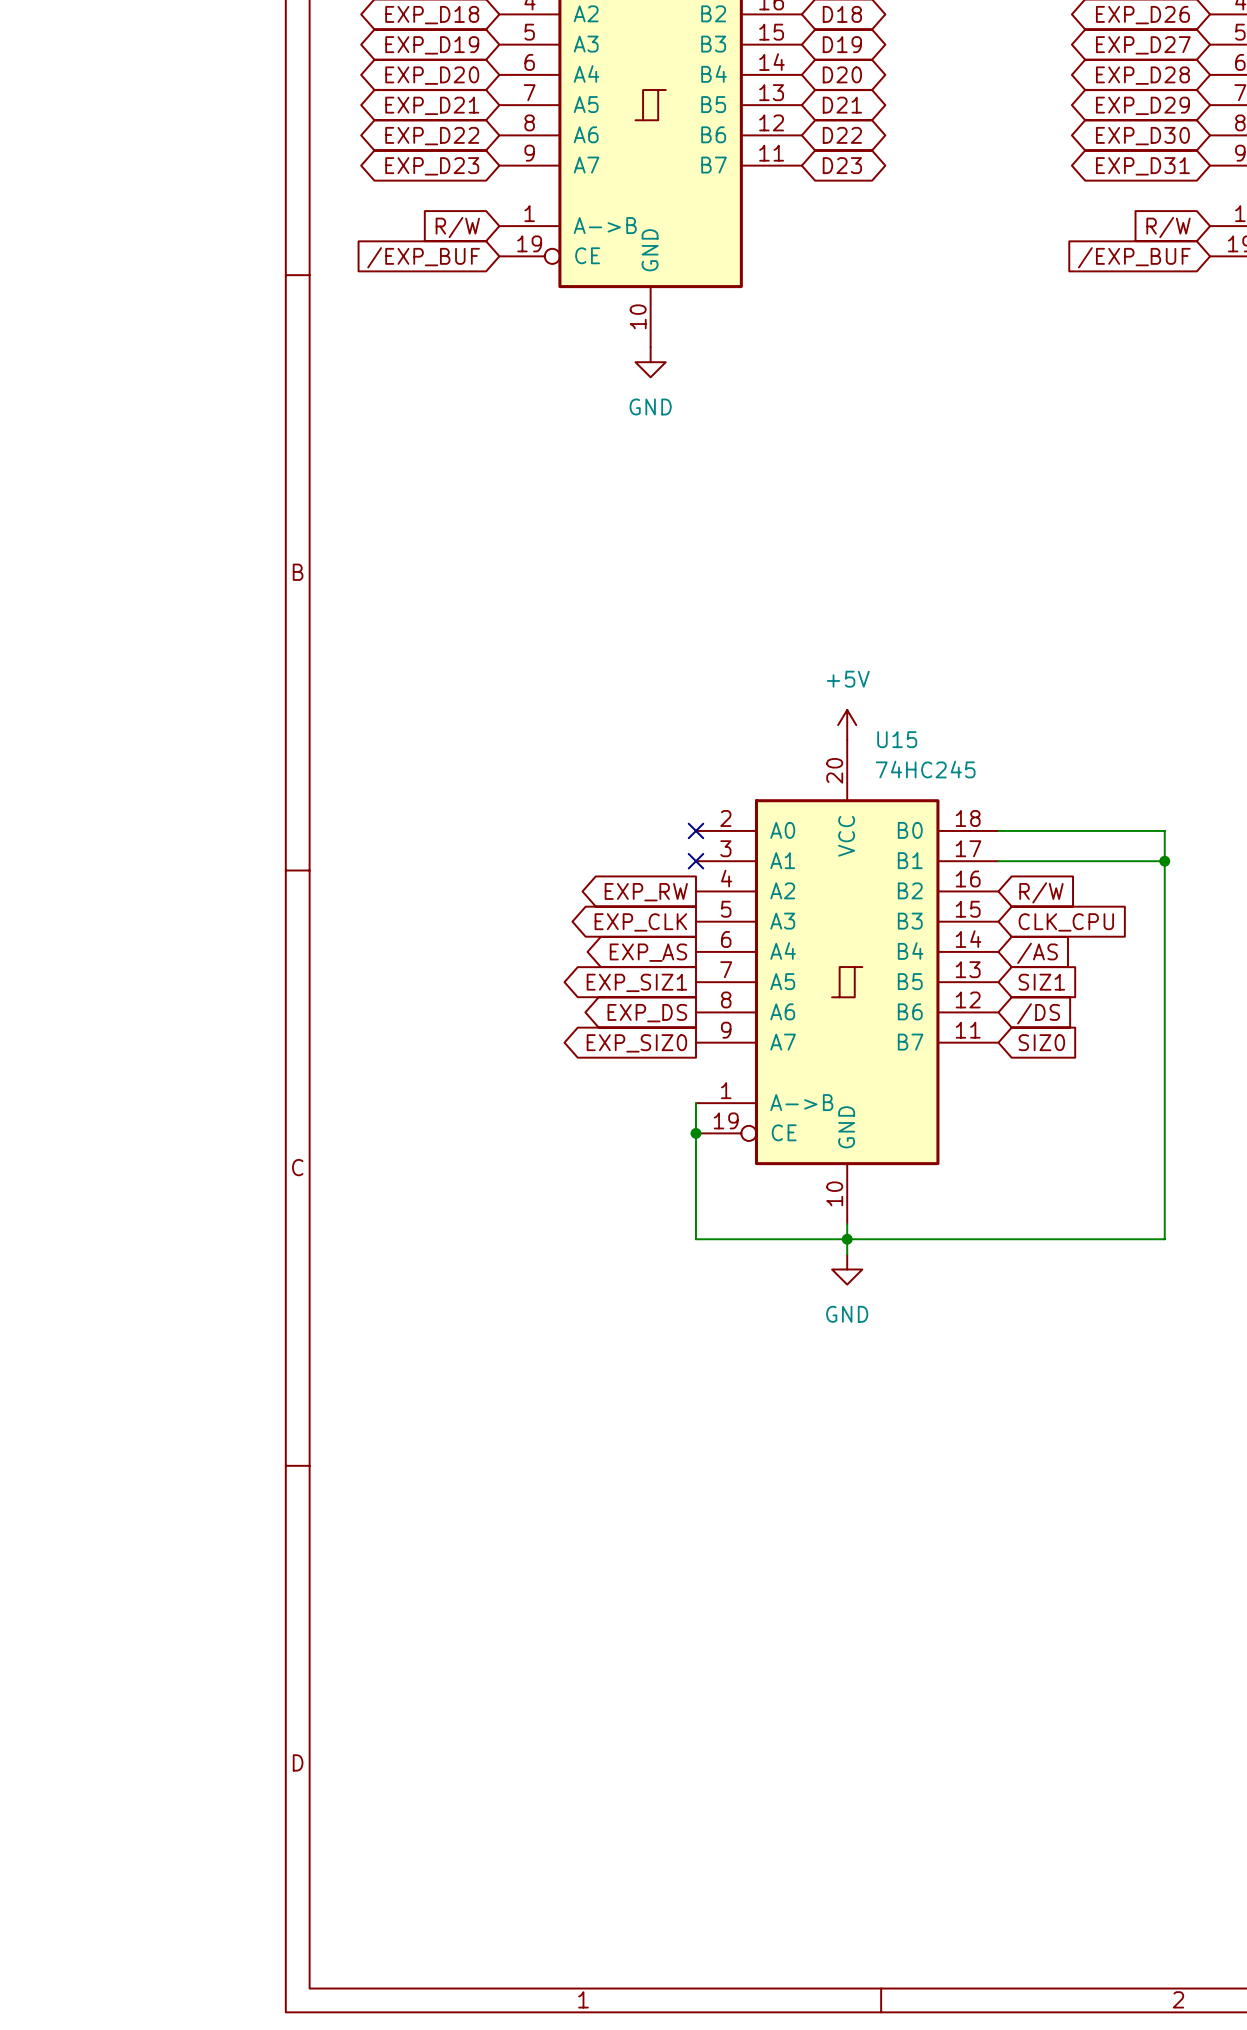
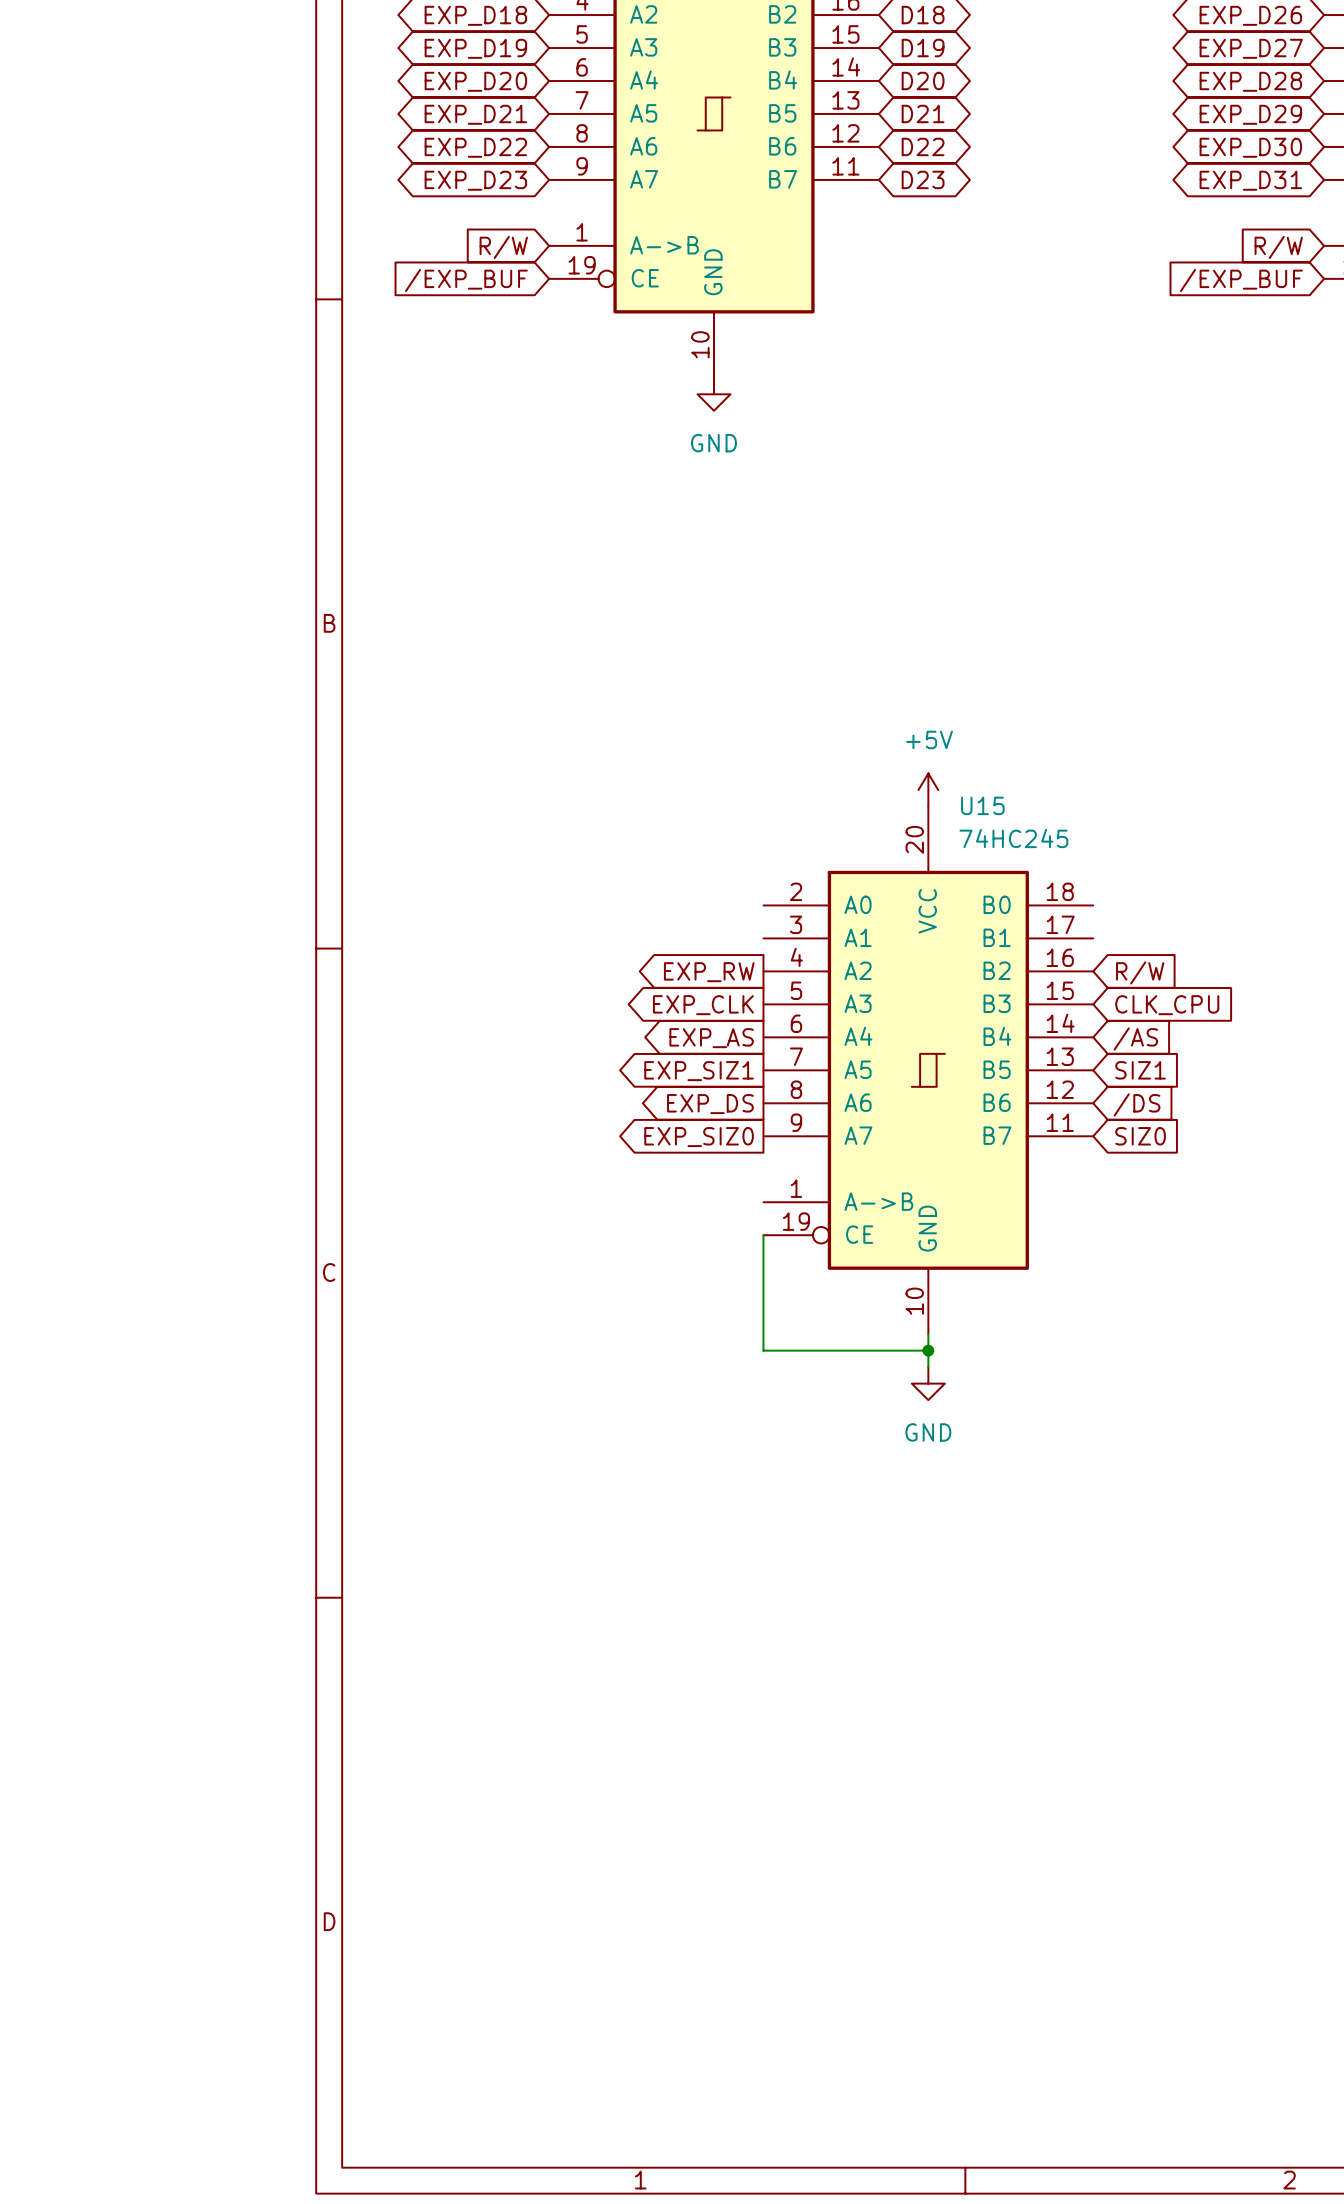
no-connect mark: (695, 830) -> none
wire: (998, 830) (1164, 830) (1164, 1239) (847, 1239) -> none
no-connect mark: (695, 861) -> none
wire: (998, 861) (1164, 861) -> none
junction: (1164, 861) -> none
wire: (695, 1103) (695, 1133) -> none
junction: (695, 1133) -> none

